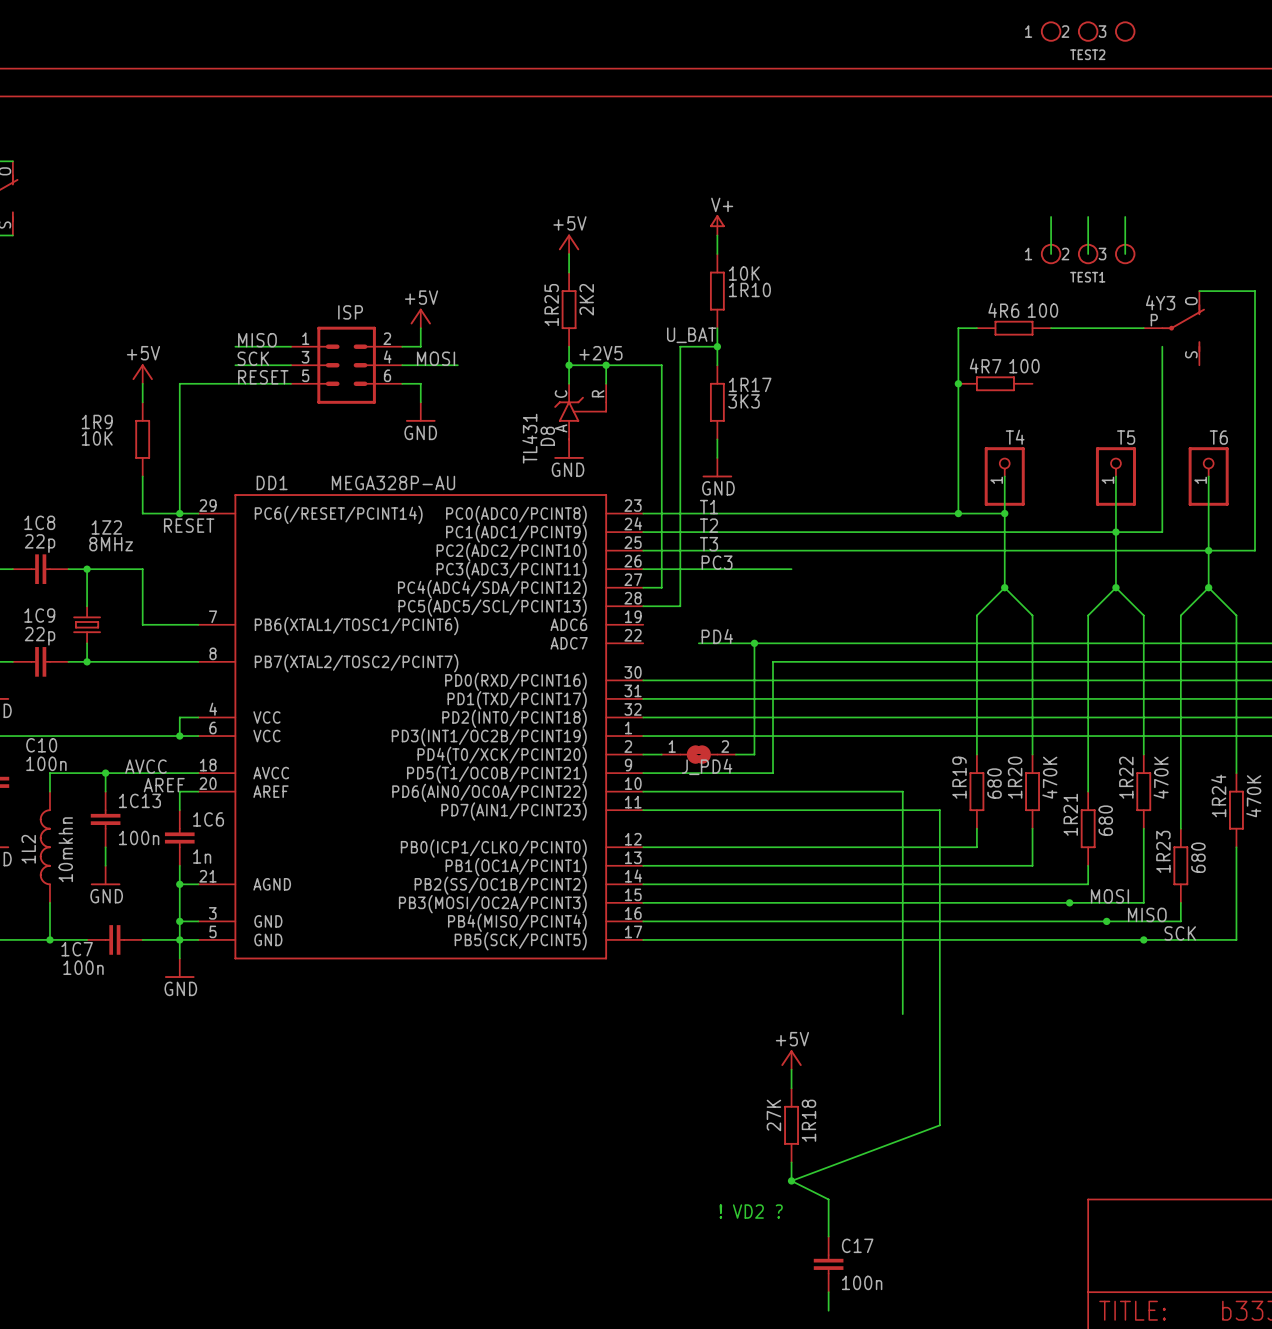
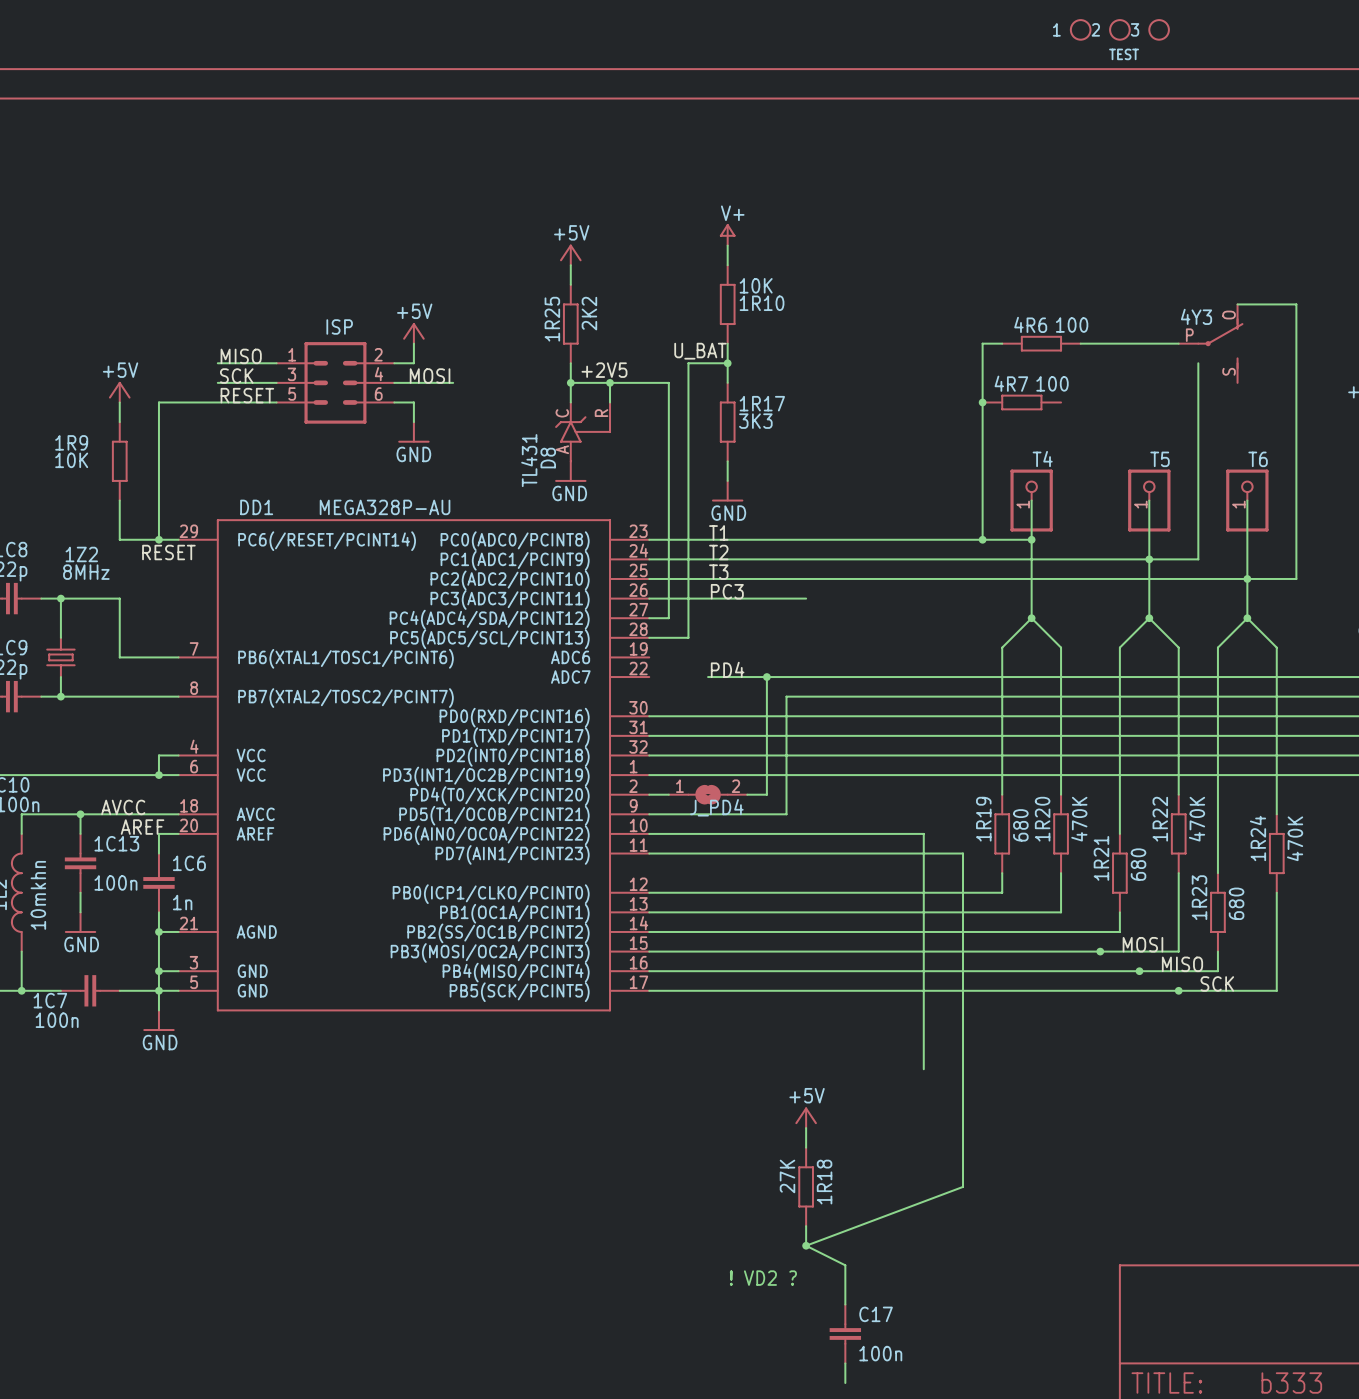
TEST2 name: TEST2 (1087, 54) -> TEST (1124, 54)
wire: (1051, 216) (1051, 254) -> none
wire: (1088, 216) (1088, 254) -> none
wire: (1125, 216) (1125, 254) -> none
TEST1: (1088, 254) -> none

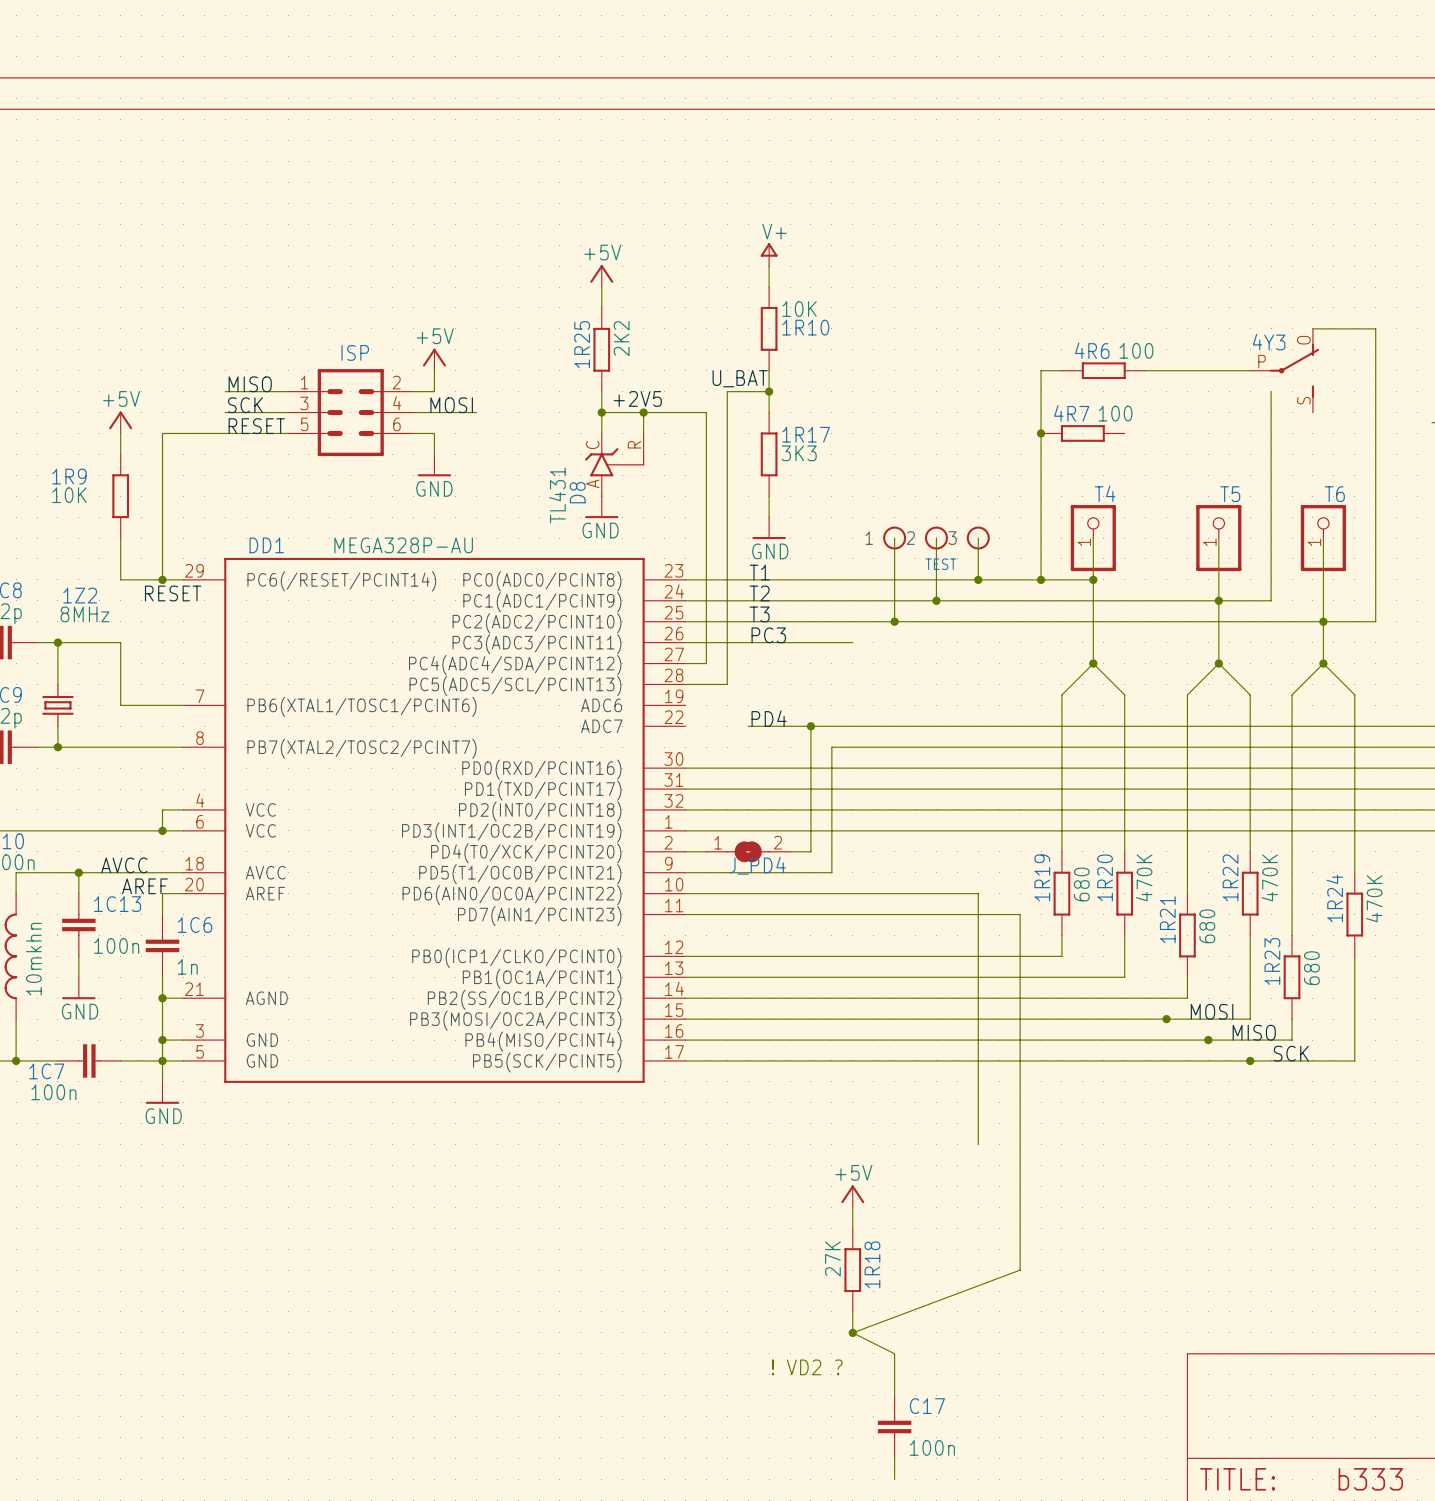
TEST: (1119, 29) -> none
wire: none -> (894, 538) (894, 621)
wire: none -> (936, 538) (936, 600)
TEST: none -> (936, 538)
wire: none -> (978, 538) (978, 579)
junction: none -> (978, 579)
junction: none -> (936, 600)
junction: none -> (894, 621)

